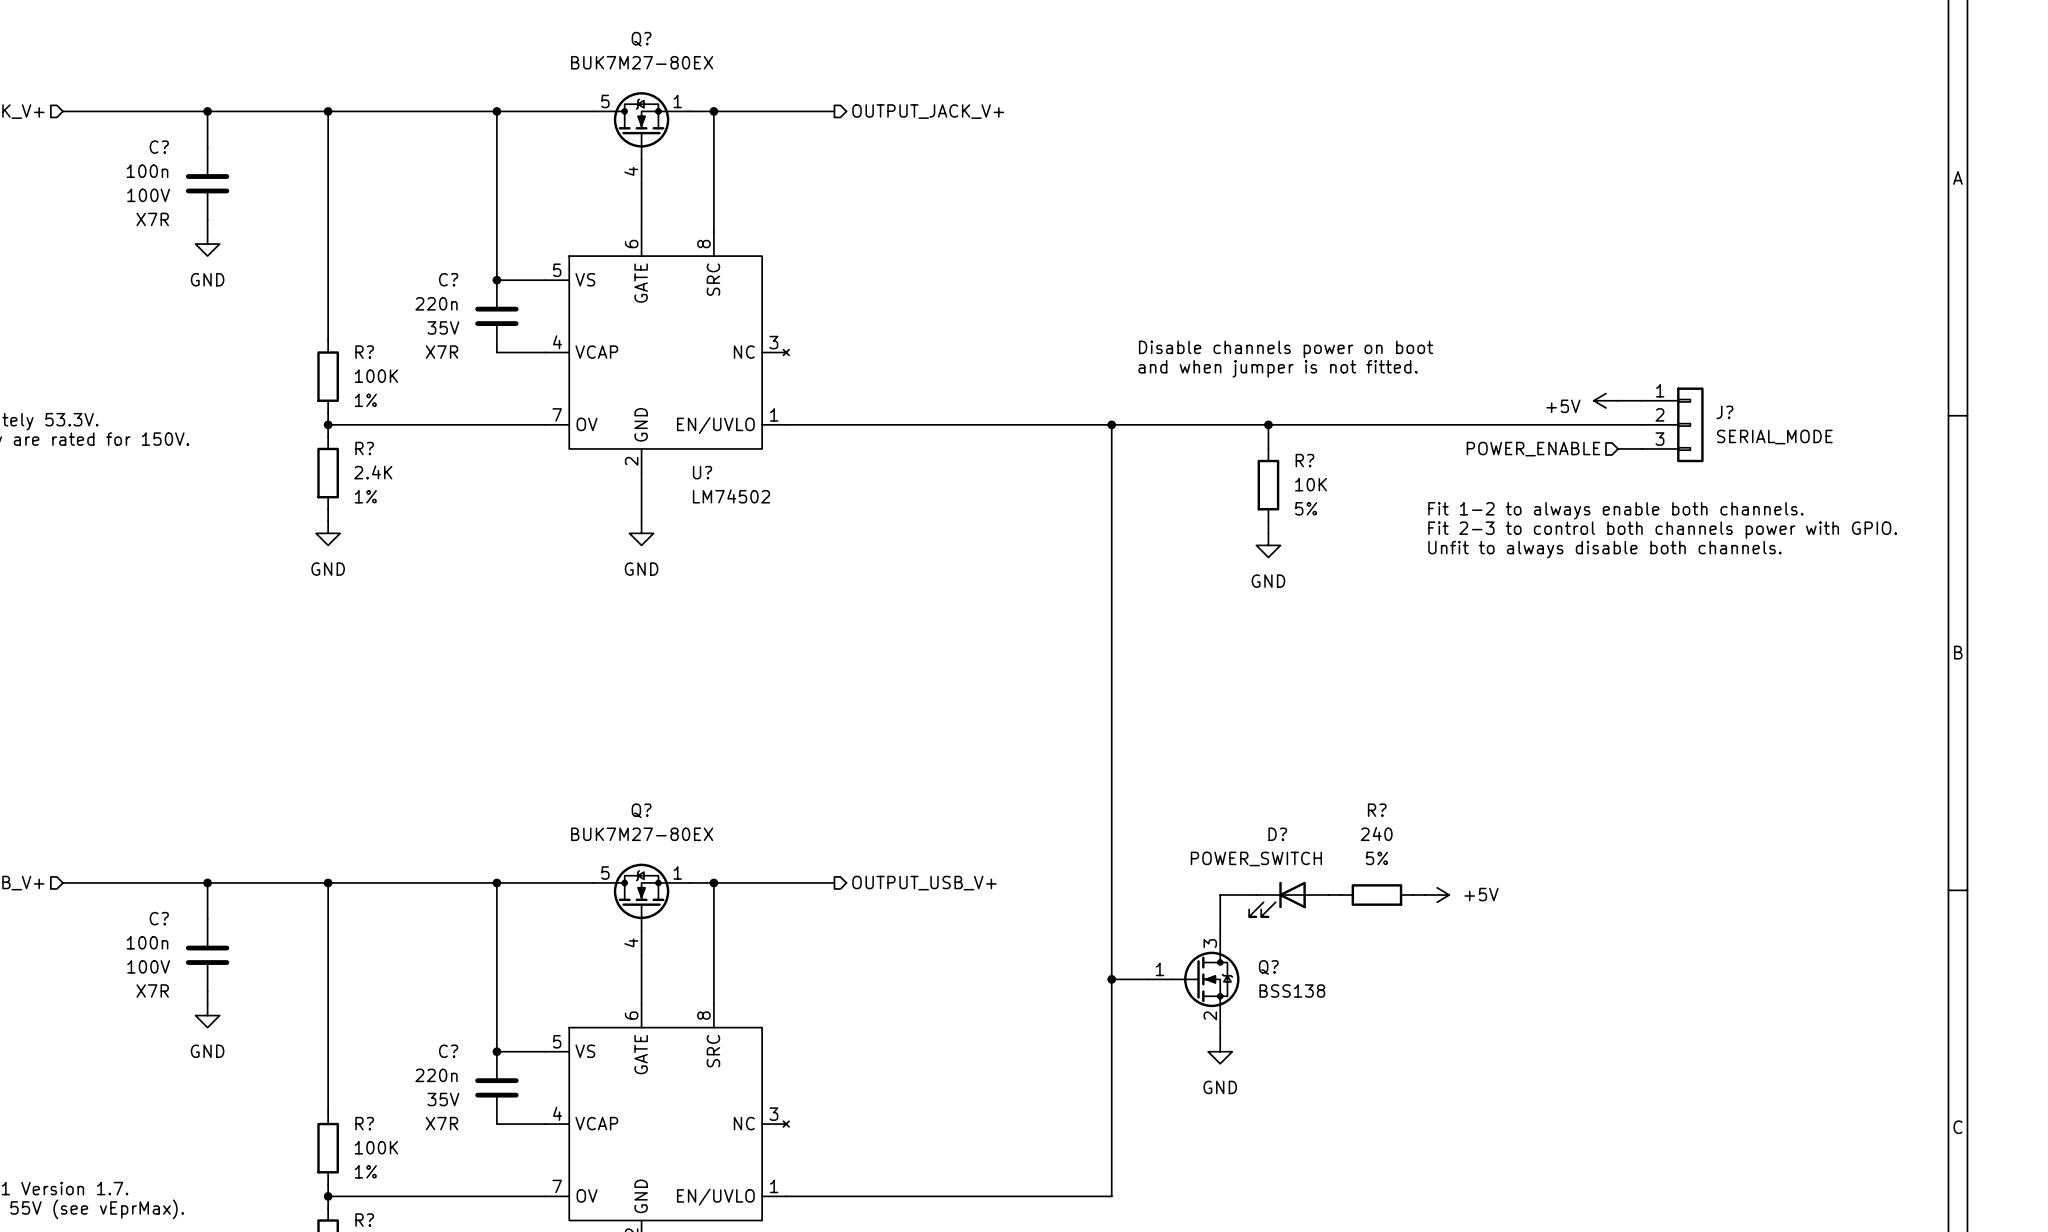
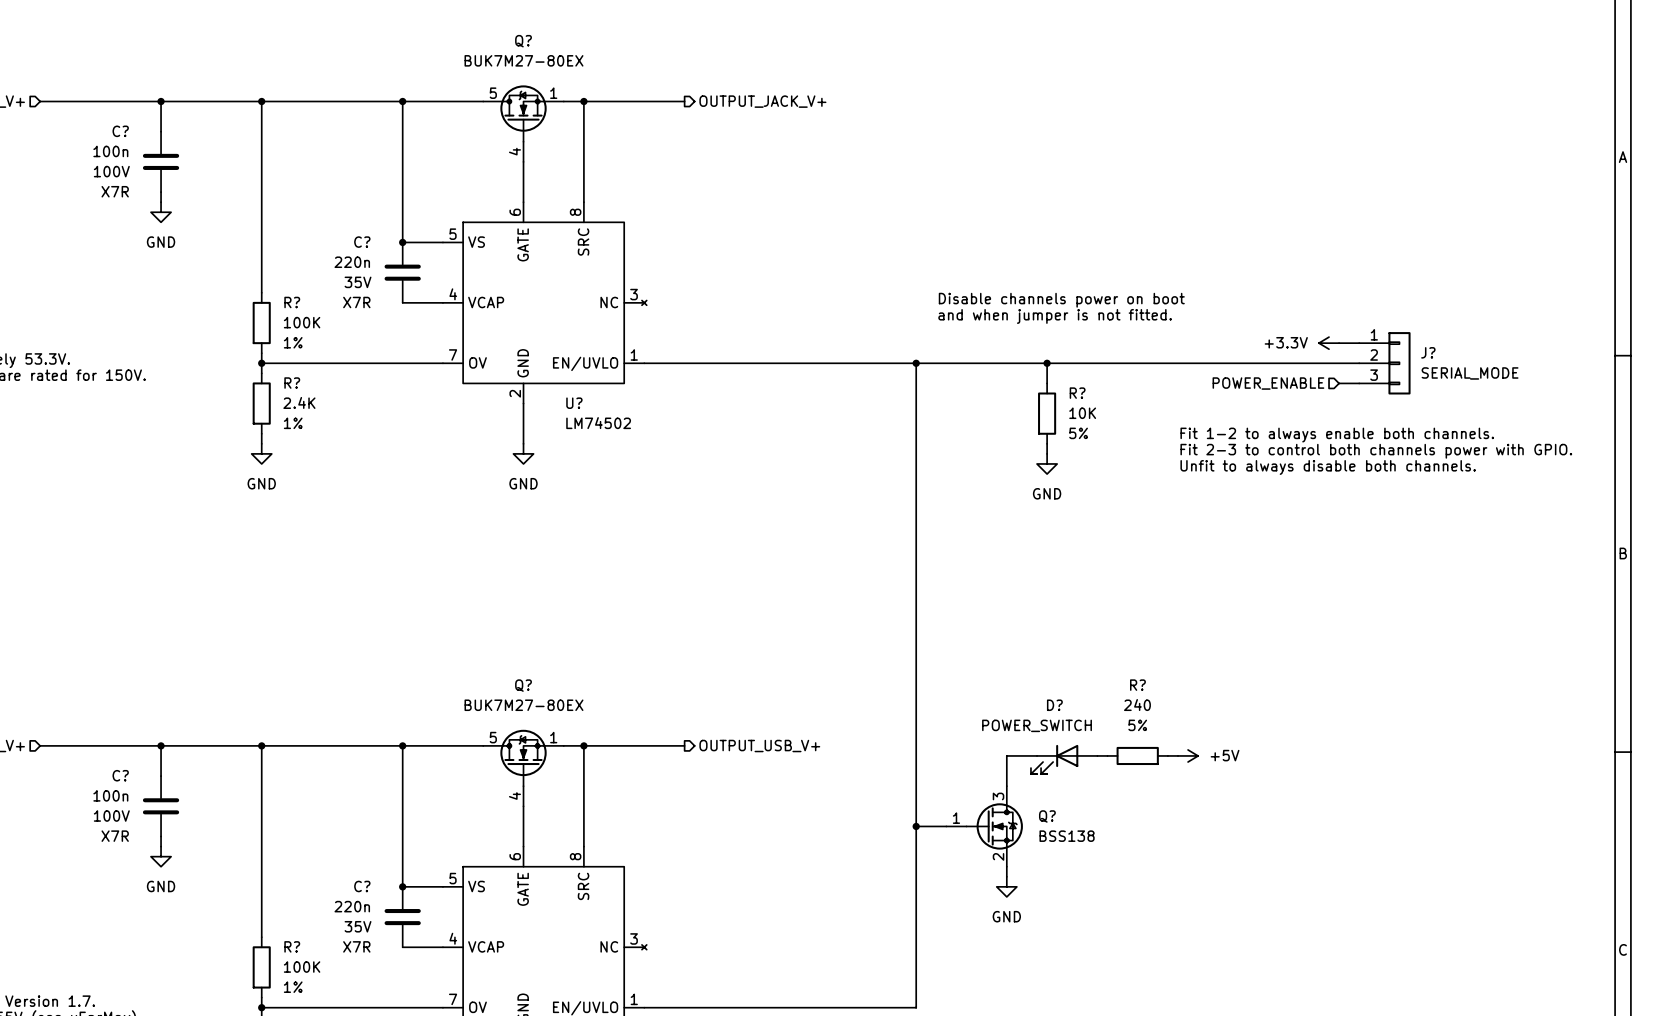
power symbol: +5V (1605, 400) -> +3.3V (1329, 343)

